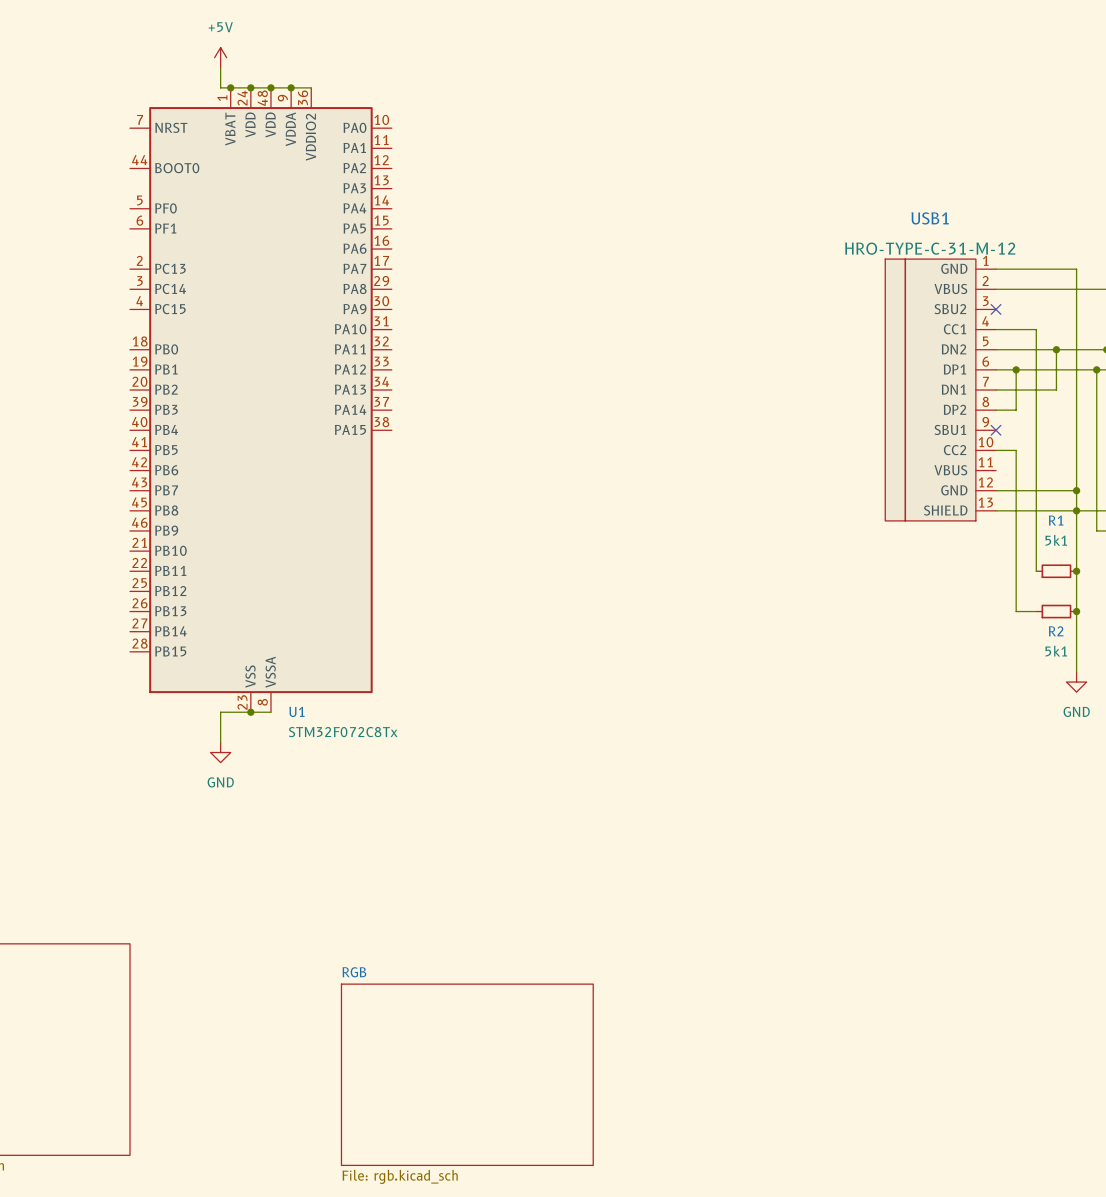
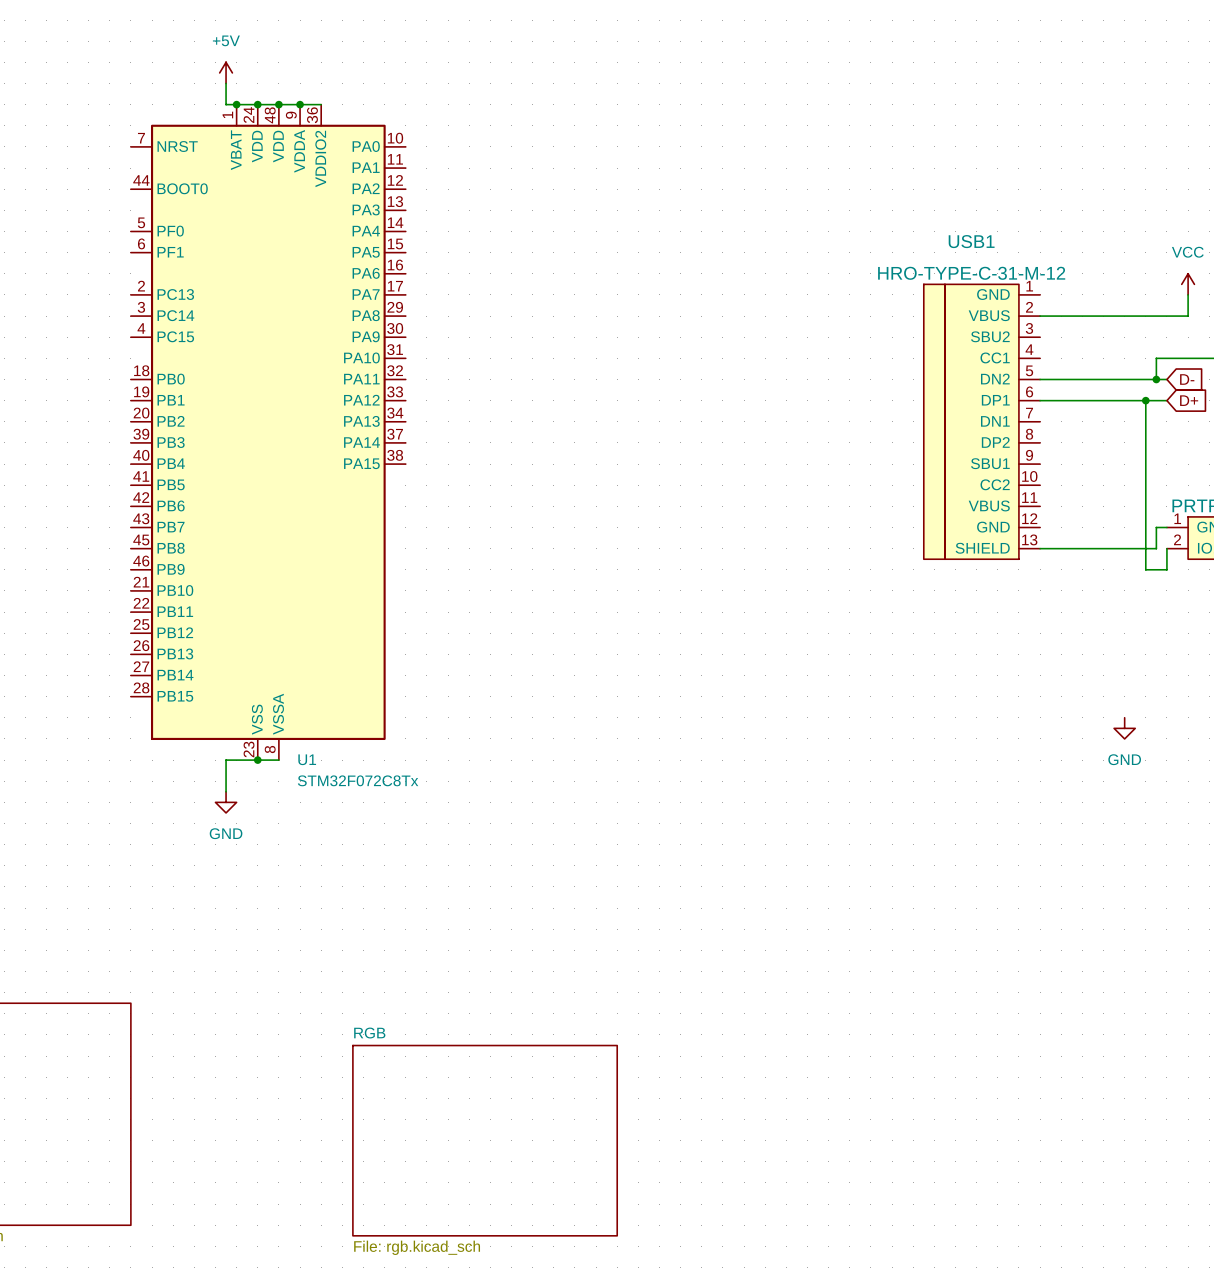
wire: (996, 269) (1076, 269) (1076, 671) -> none
no-connect mark: (996, 309) -> none
wire: (996, 329) (1036, 329) (1036, 571) -> none
wire: (1056, 349) (1056, 390) (996, 390) -> none
junction: (1056, 349) -> none
wire: (1016, 369) (1016, 410) (996, 410) -> none
junction: (1016, 369) -> none
no-connect mark: (996, 430) -> none
wire: (996, 450) (1016, 450) (1016, 611) (1036, 611) -> none
wire: (996, 490) (1076, 490) -> none
junction: (1076, 490) -> none
junction: (1076, 510) -> none
R1: 5k1 (1056, 571) -> none
junction: (1076, 571) -> none
R2: 5k1 (1056, 611) -> none
junction: (1076, 611) -> none

